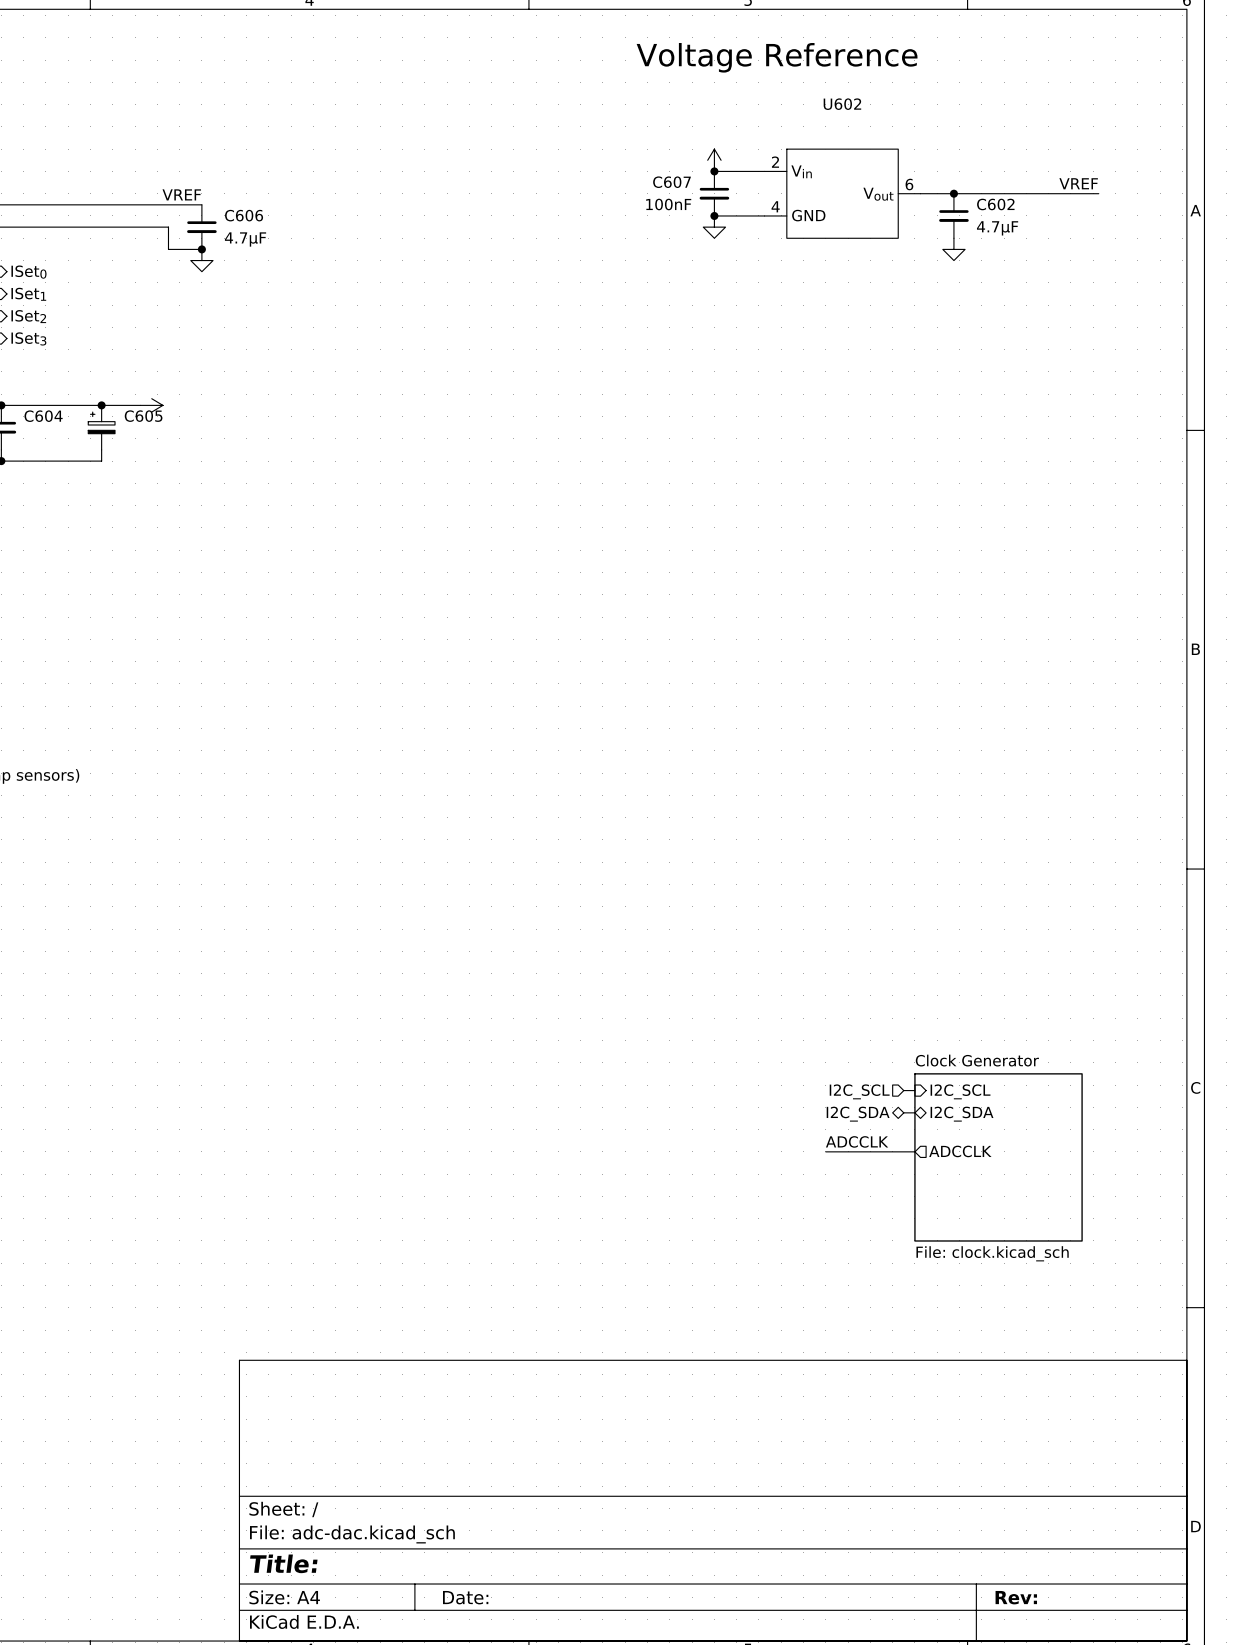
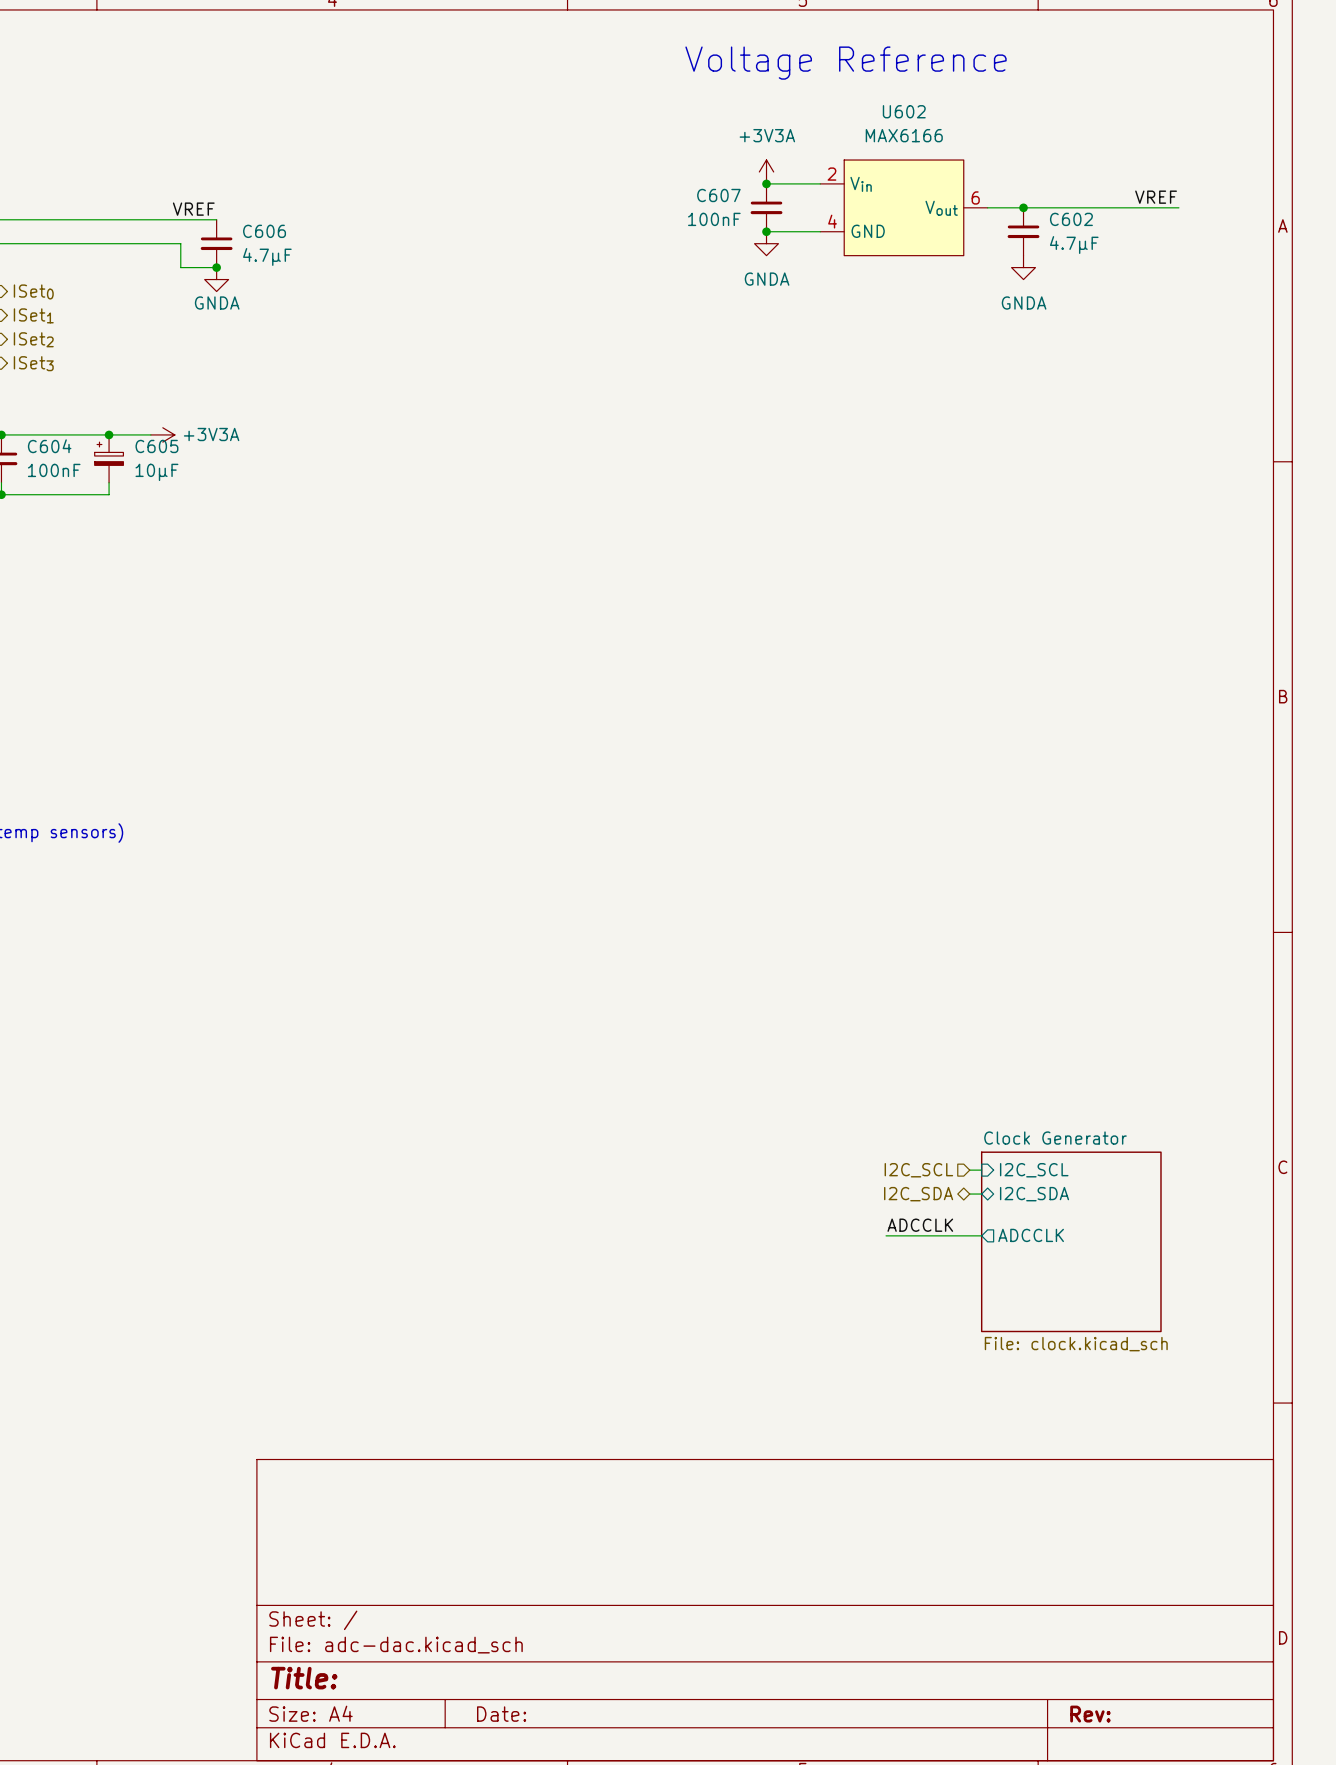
power symbol text: none -> +3V3A (767, 135)
U602 value: none -> MAX6166 (904, 135)
power symbol text: none -> GNDA (767, 279)
power symbol text: none -> GNDA (217, 303)
power symbol text: none -> GNDA (1024, 303)
power symbol text: none -> +3V3A (211, 434)
C604 value: none -> 100nF (54, 470)
C605 value: none -> 10µF (156, 472)

